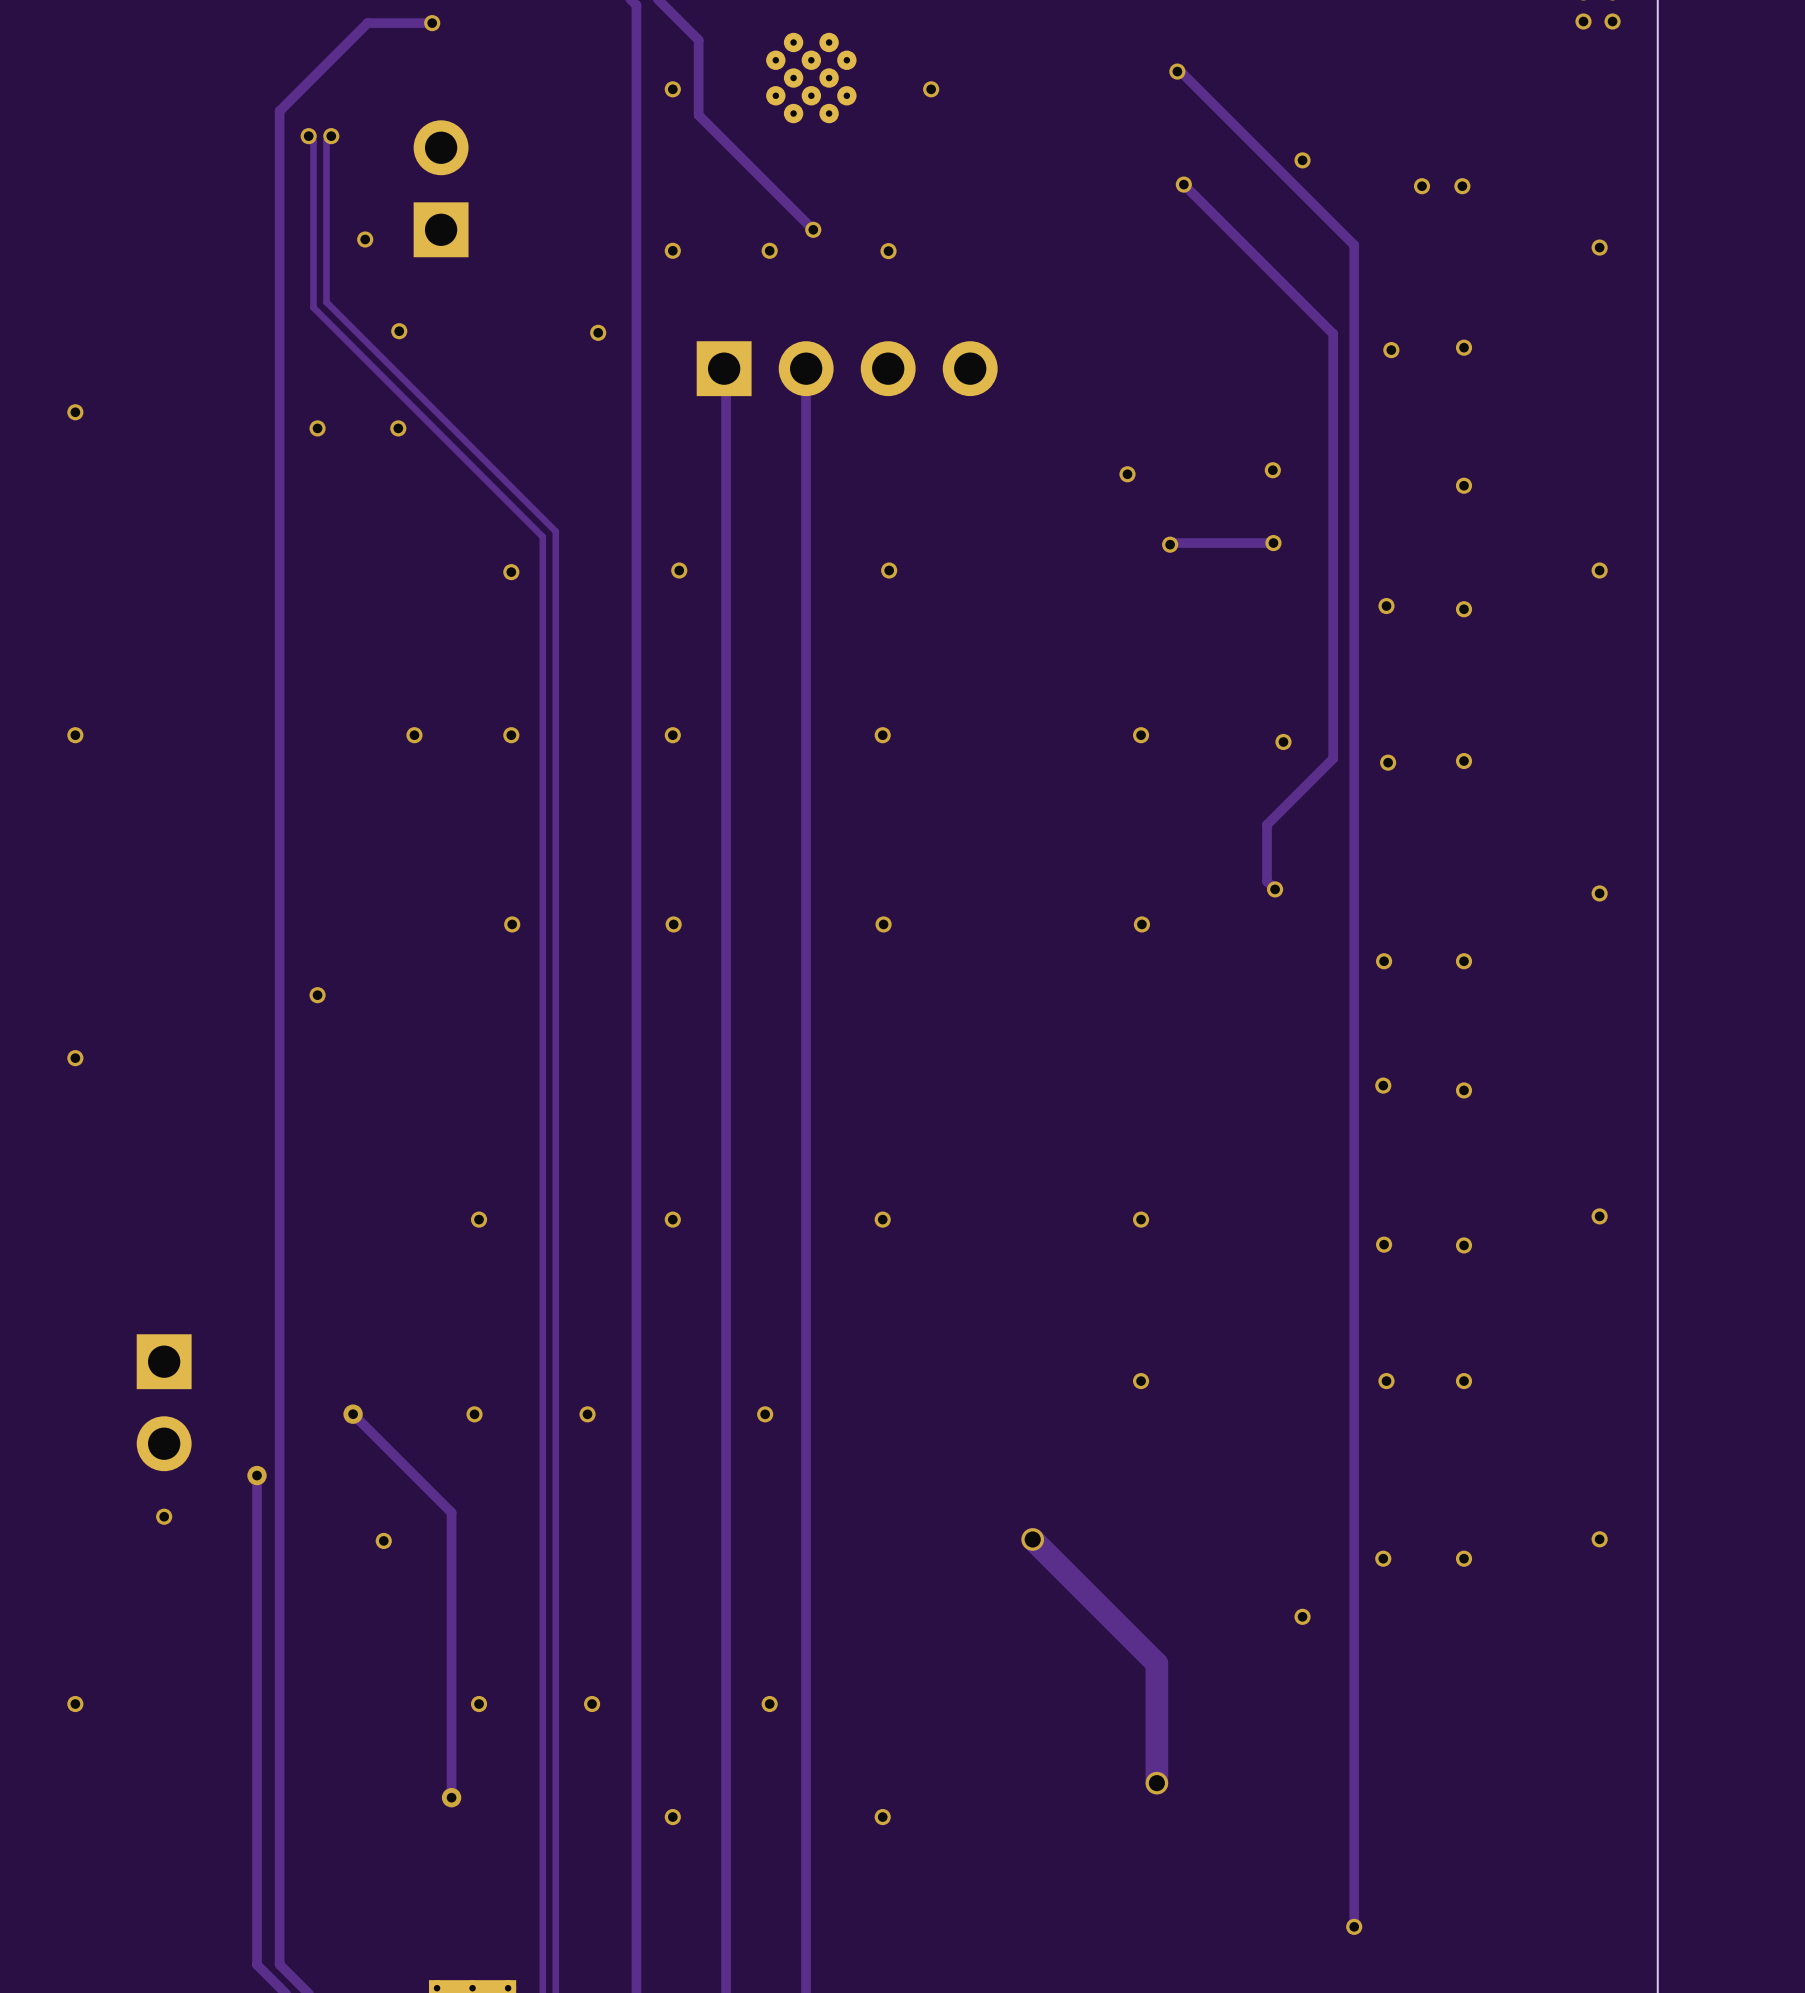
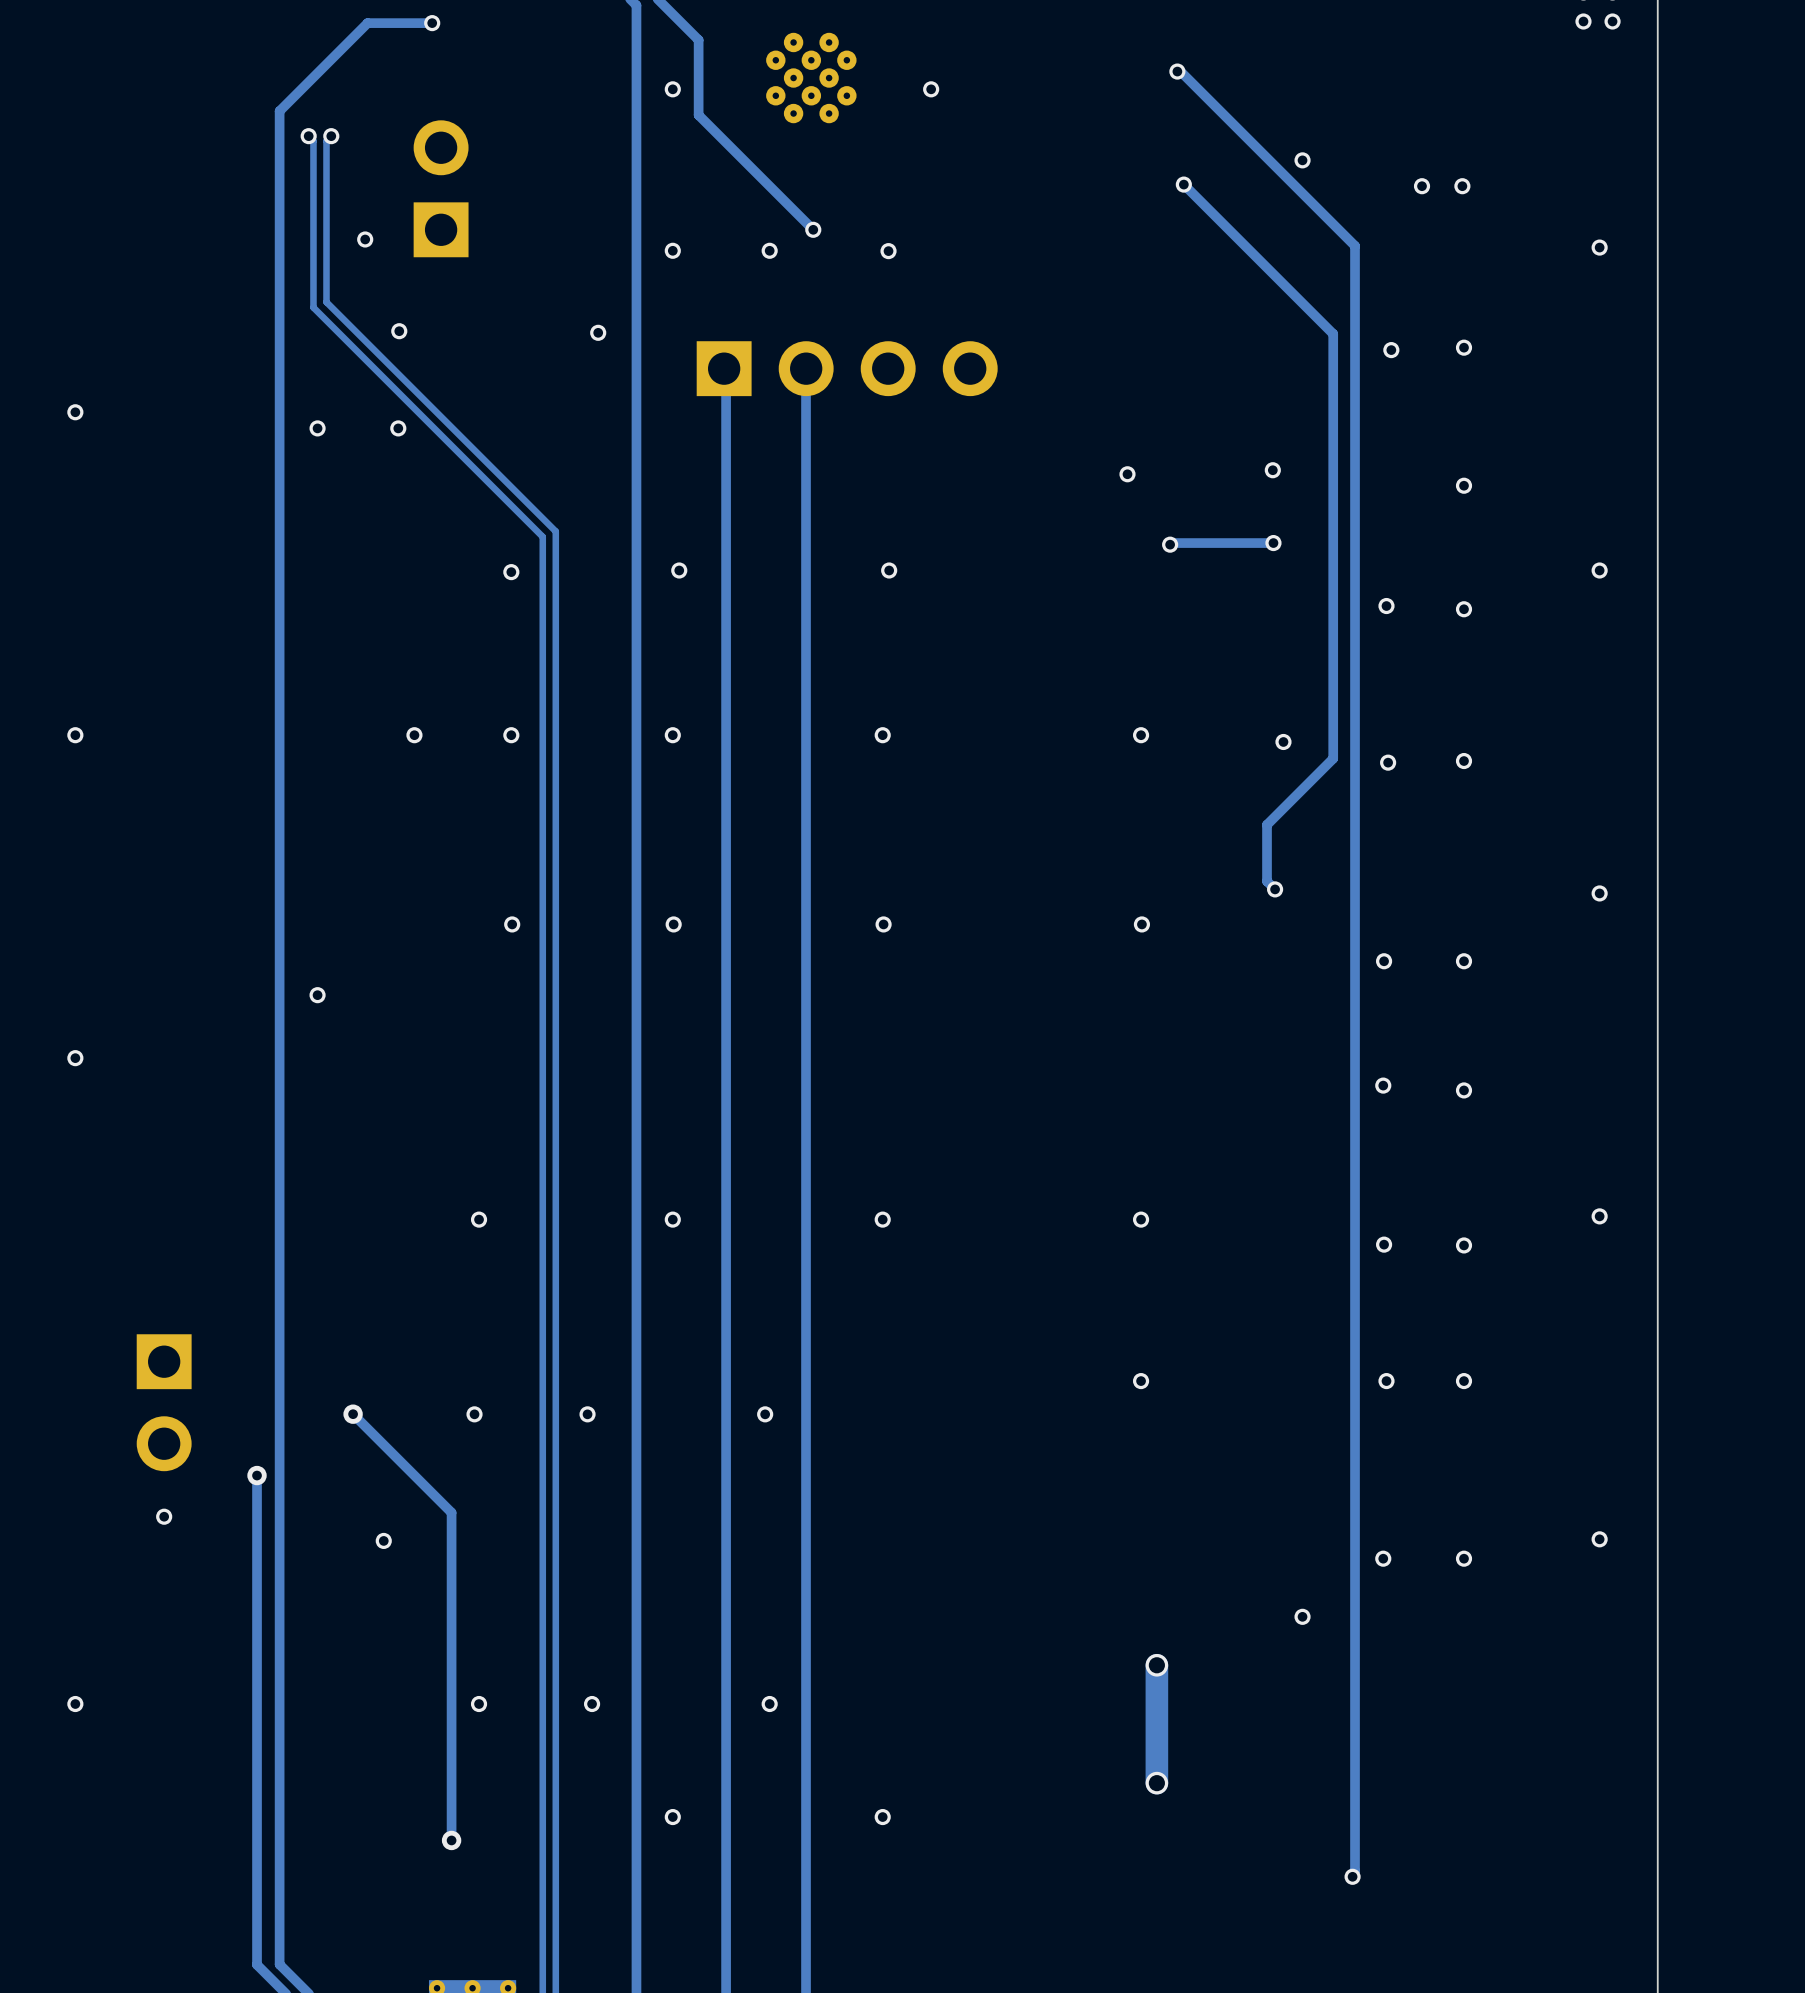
track: (1354, 245) (1354, 1926) -> (1354, 245) (1355, 1871) (1352, 1876)
track: (1032, 1539) (1156, 1665) -> none
via position: (1032, 1539) -> (1156, 1665)
track: none -> (451, 1797) (451, 1840)
via position: (451, 1797) -> (451, 1840)
via position: (1354, 1926) -> (1352, 1876)

